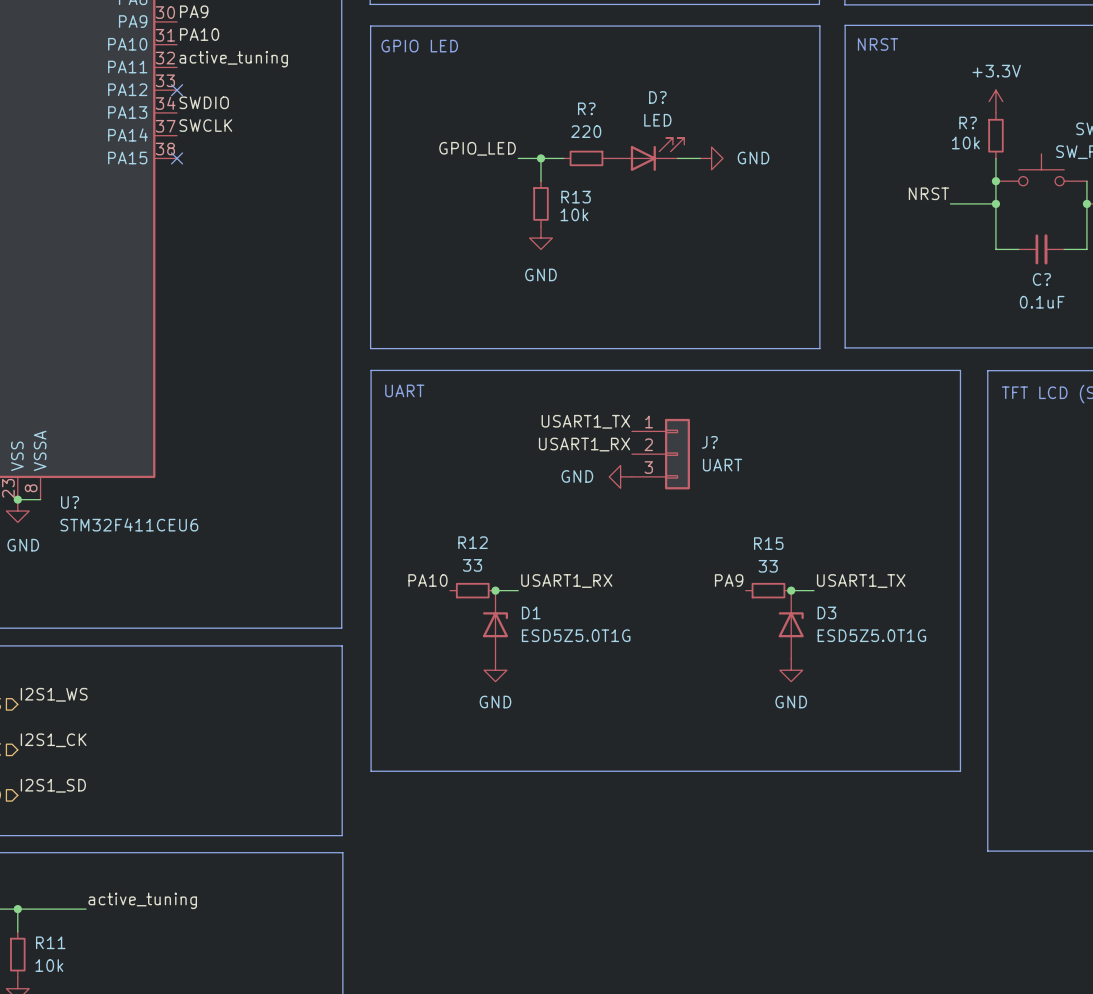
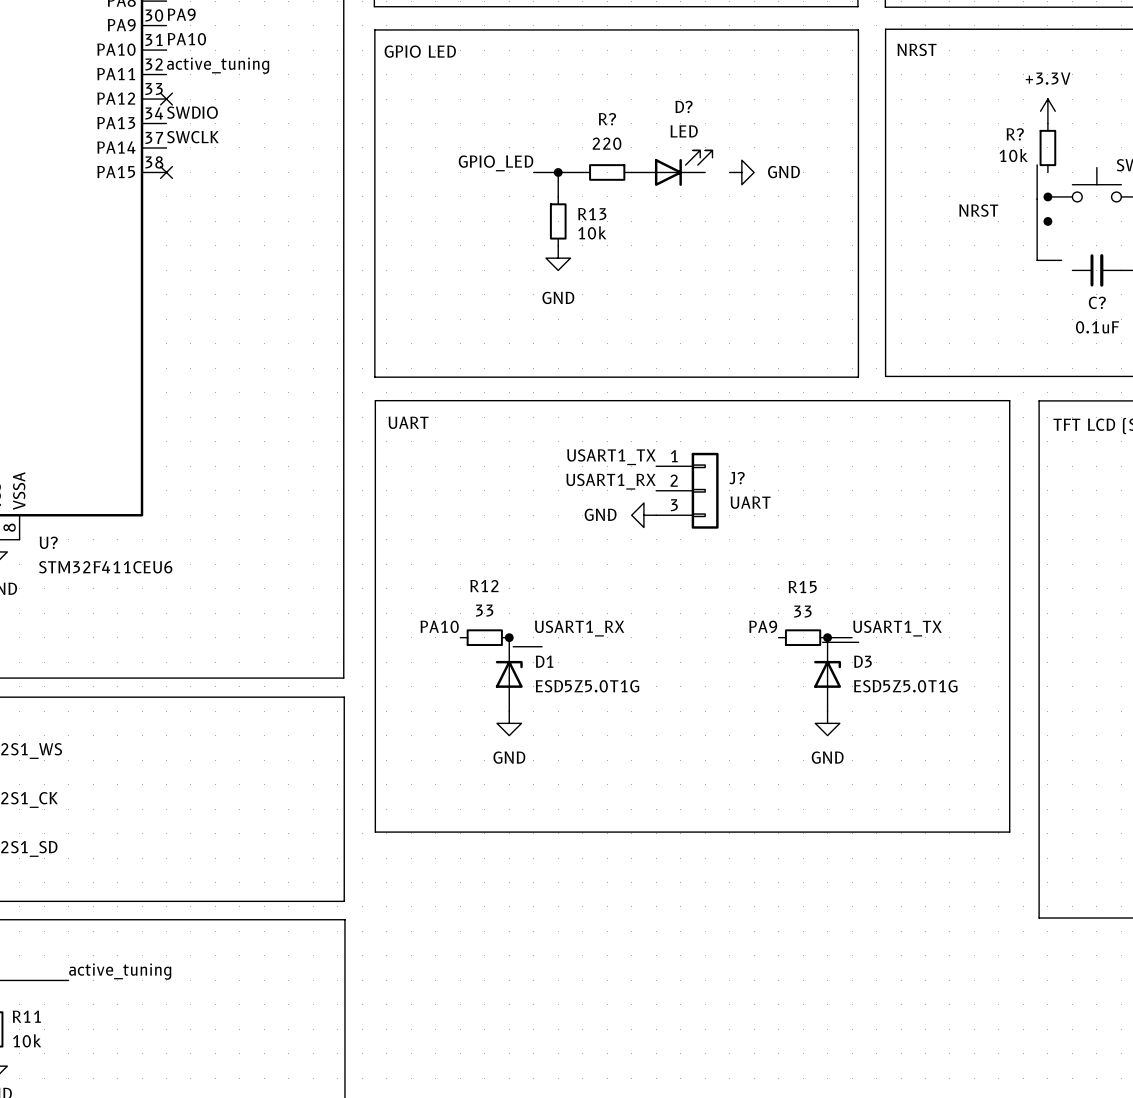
wire: none -> (1037, 164) (1037, 260) (1061, 260)
wire: (677, 158) (700, 158) -> none
wire: (995, 158) (995, 249) (1018, 249) -> none
wire: (950, 203) (995, 203) -> none
wire: (495, 590) (518, 590) -> none
wire: none -> (822, 642) (858, 642)
wire: none -> (513, 646) (542, 646)

